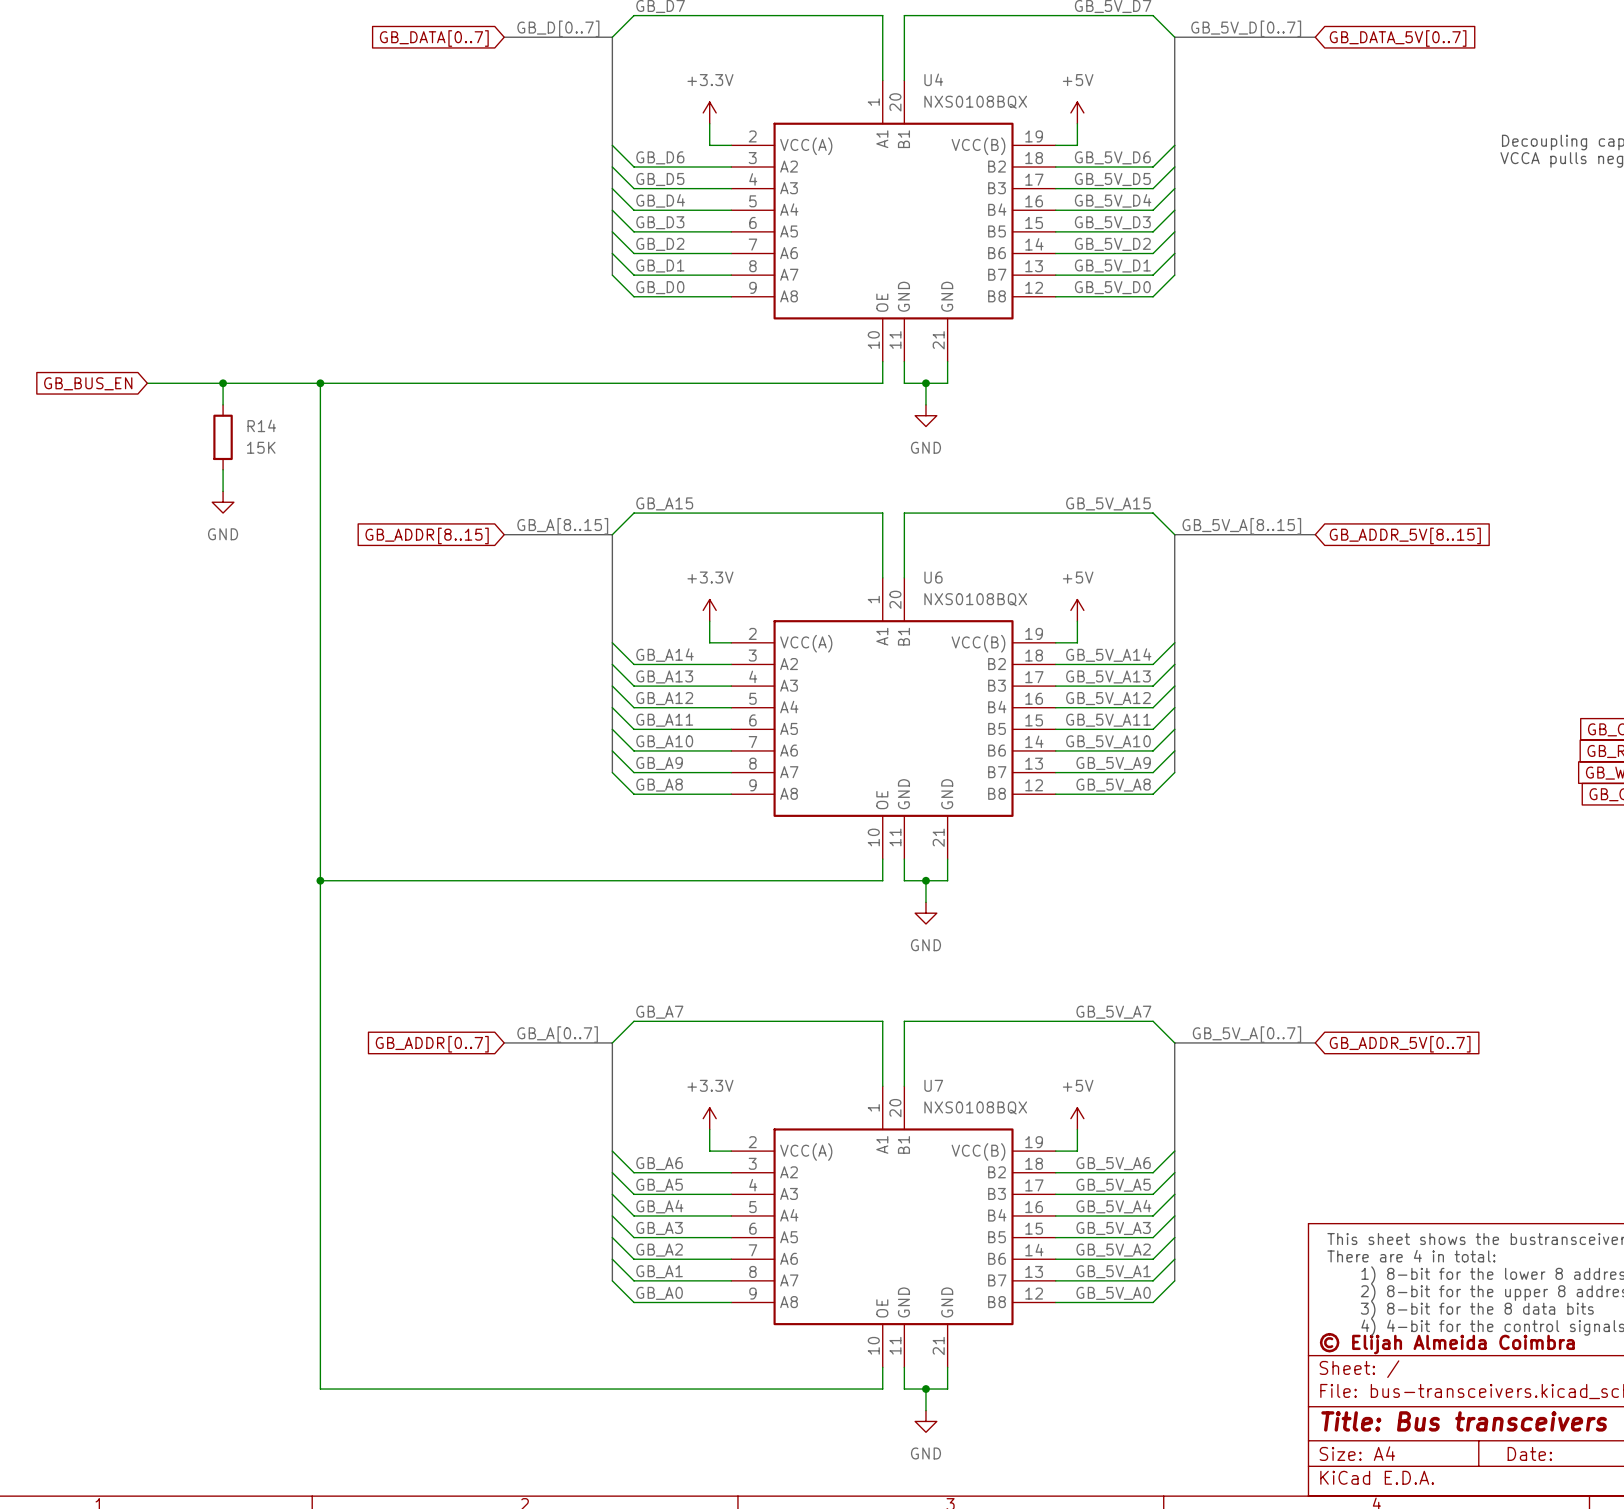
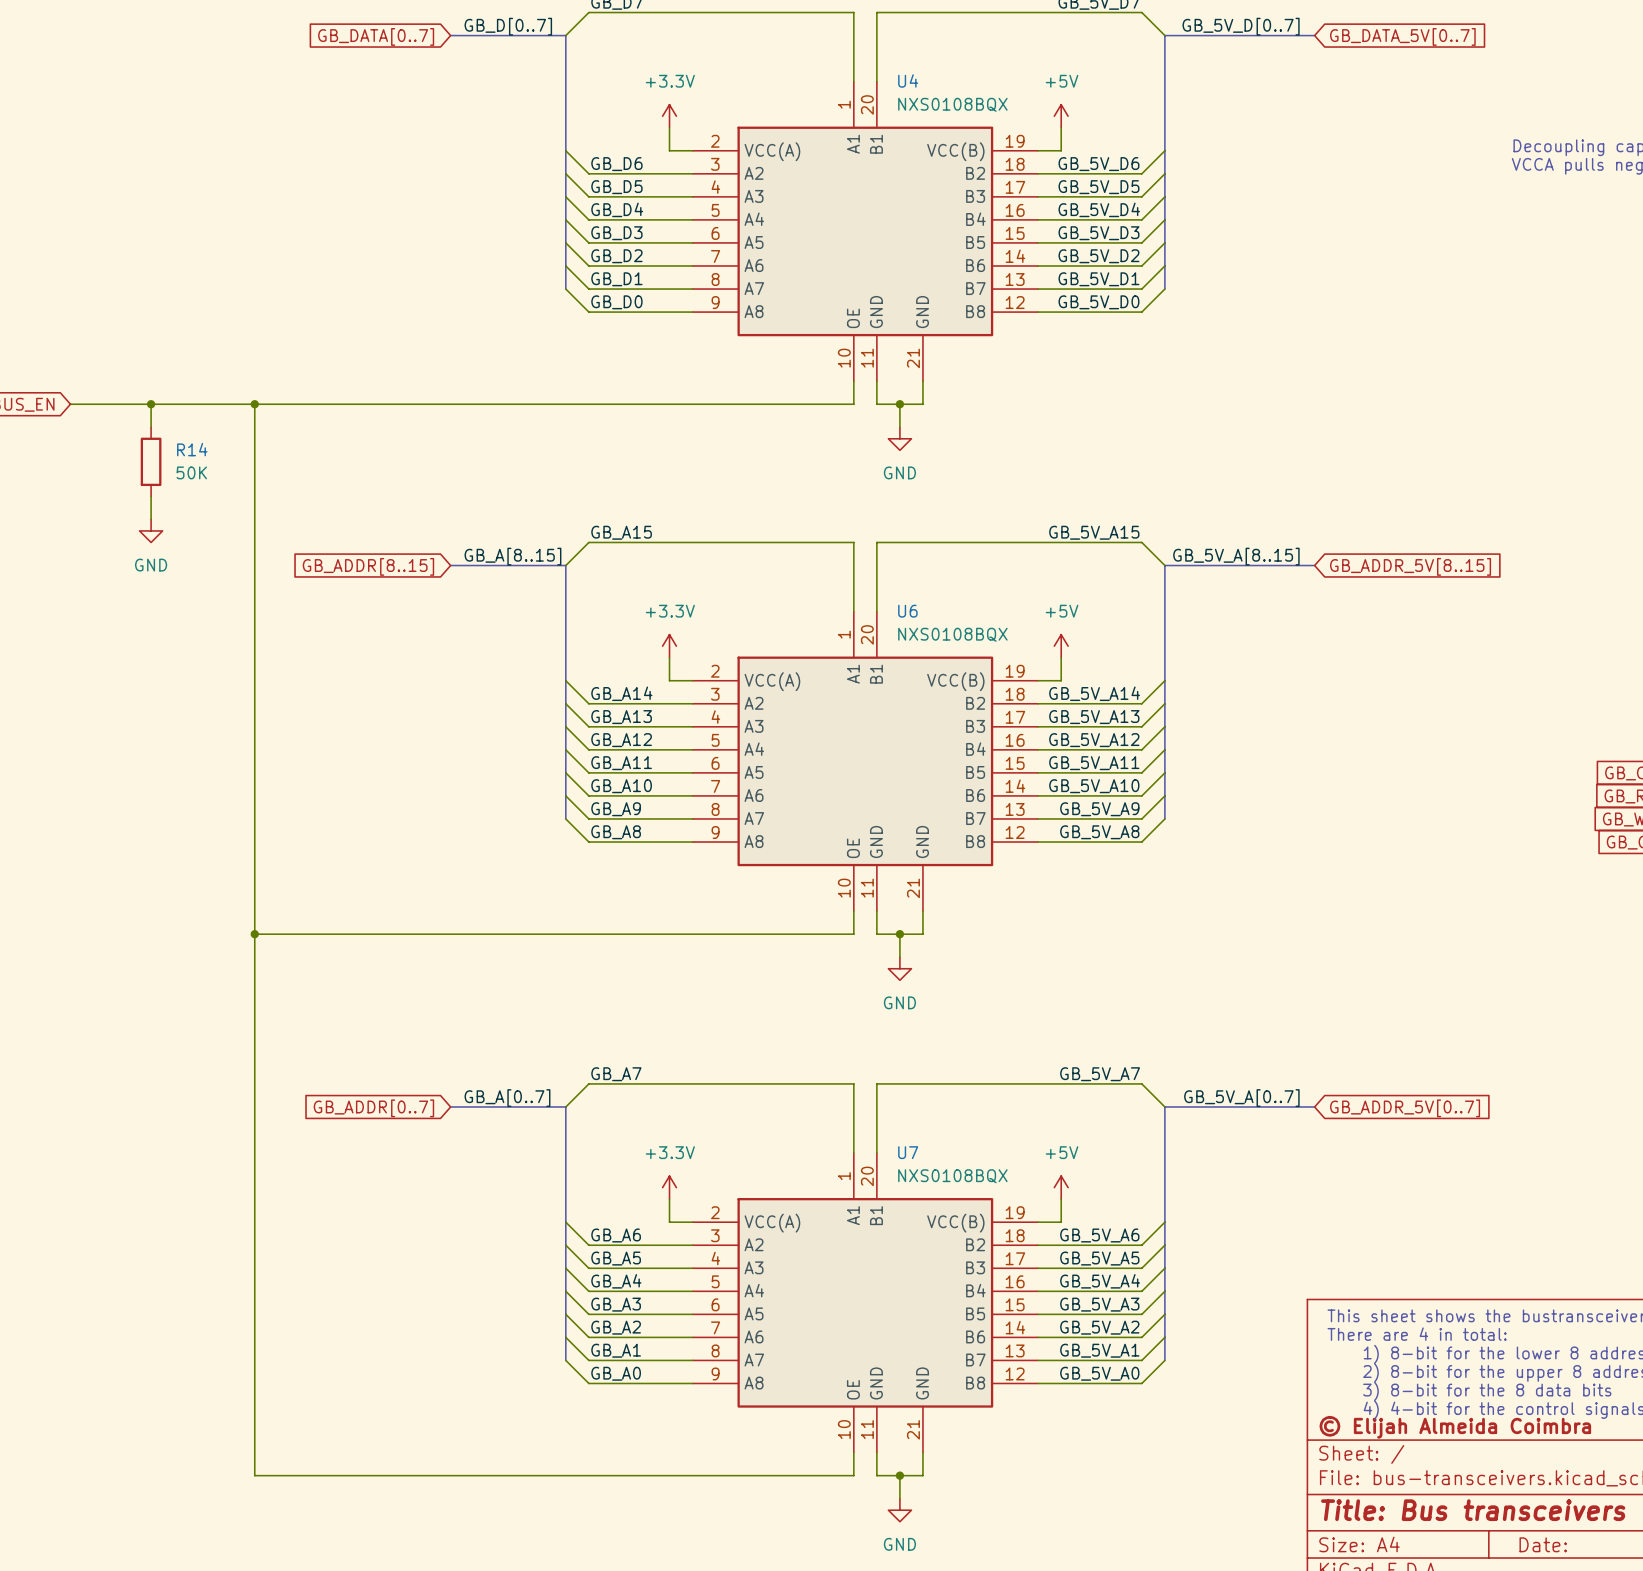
R14 value: 15K (261, 447) -> 50K (191, 472)

